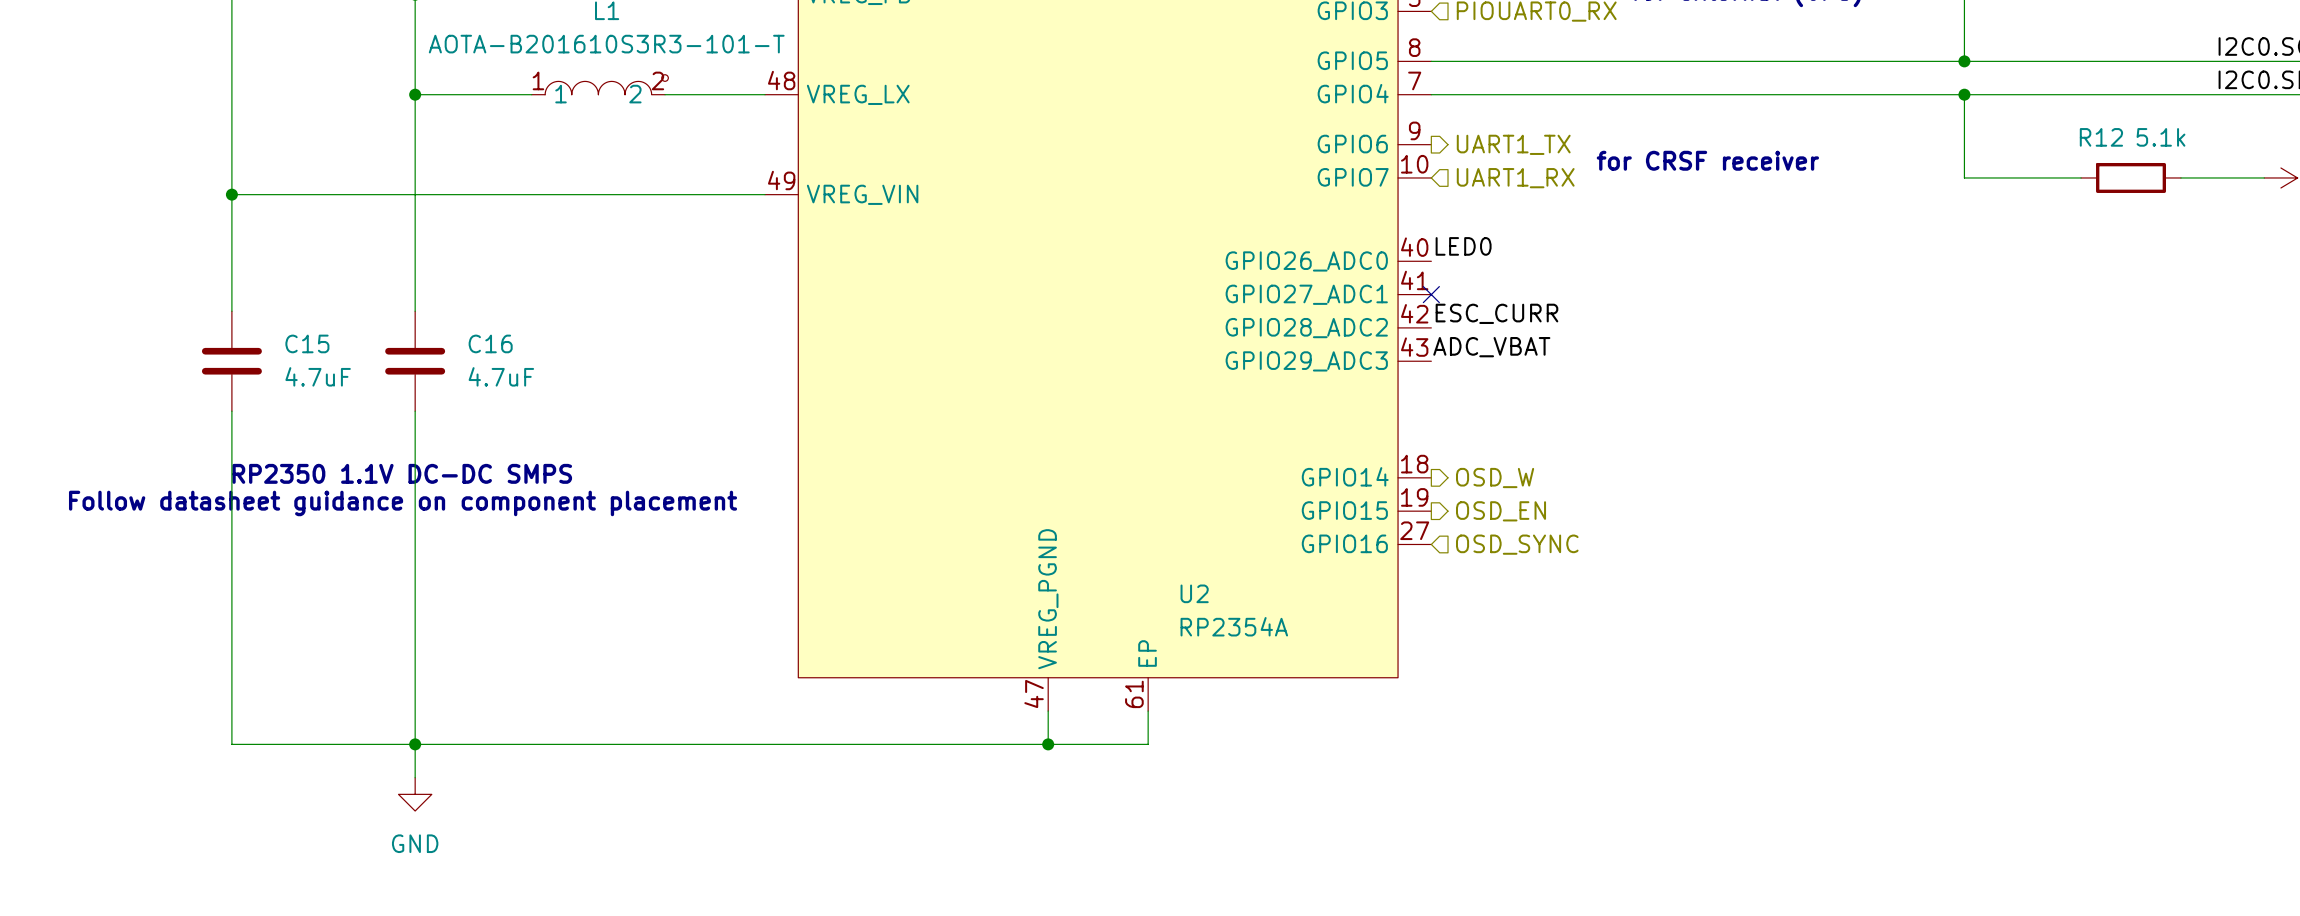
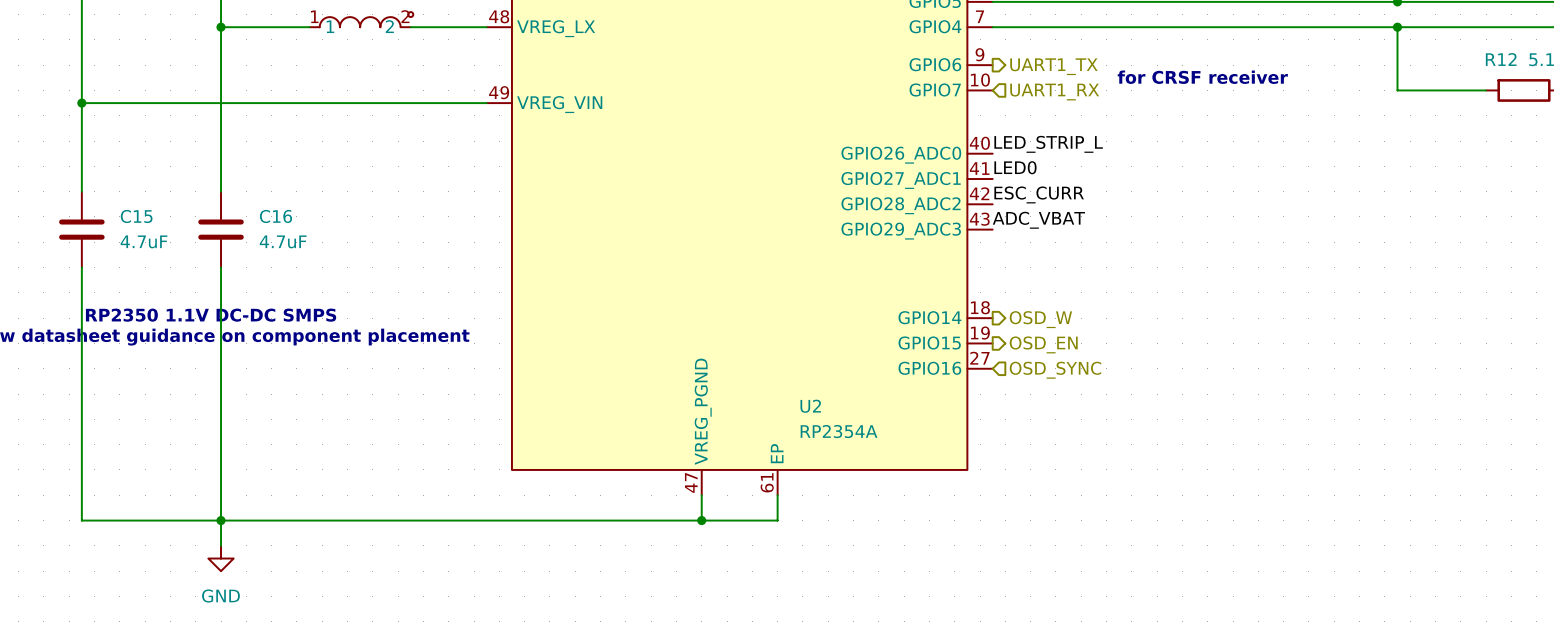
label: LED0 (1463, 246) -> LED_STRIP_L (1048, 144)
label: none -> LED0 (1015, 167)
no-connect mark: (1431, 294) -> none

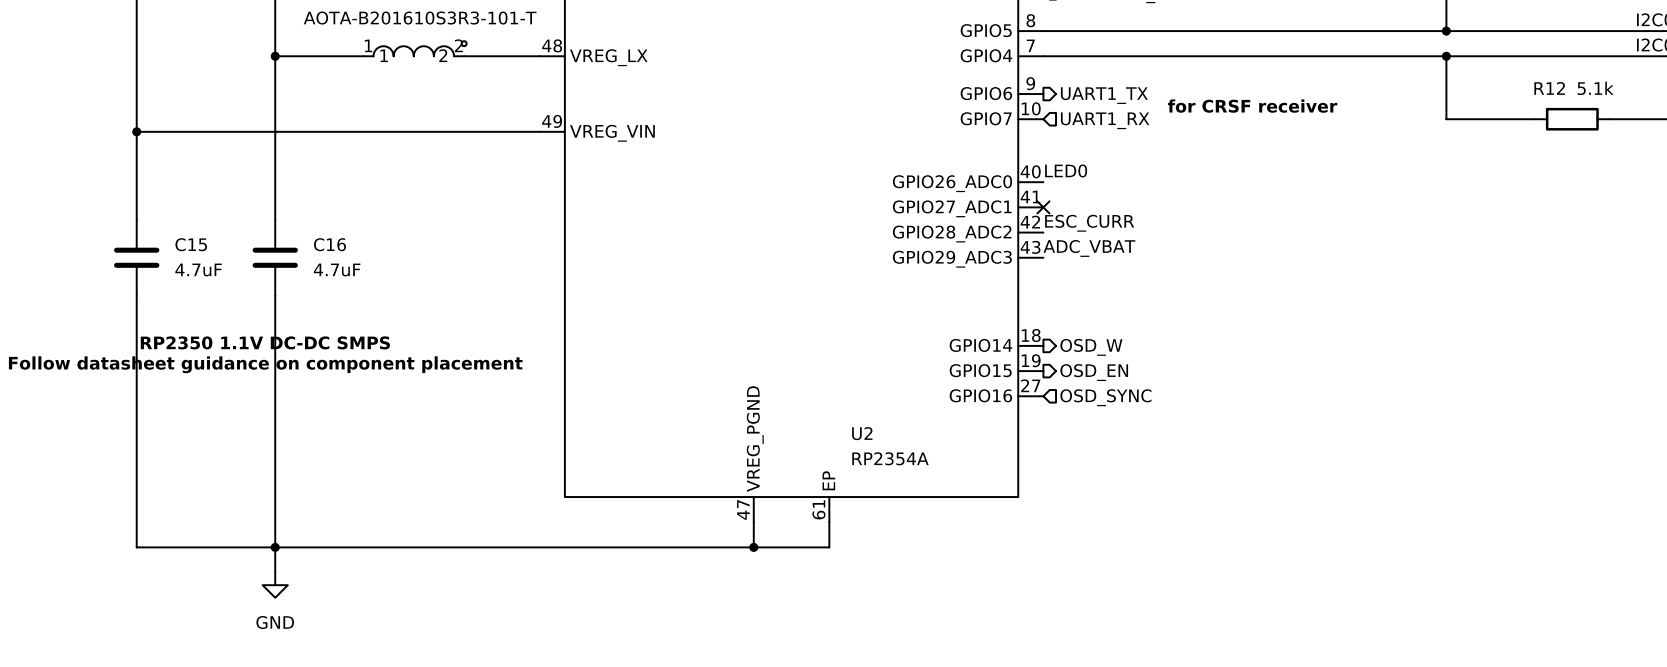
label: LED_STRIP_L (1048, 144) -> LED0 (1066, 170)
label: LED0 (1015, 167) -> none
no-connect mark: none -> (1043, 207)

